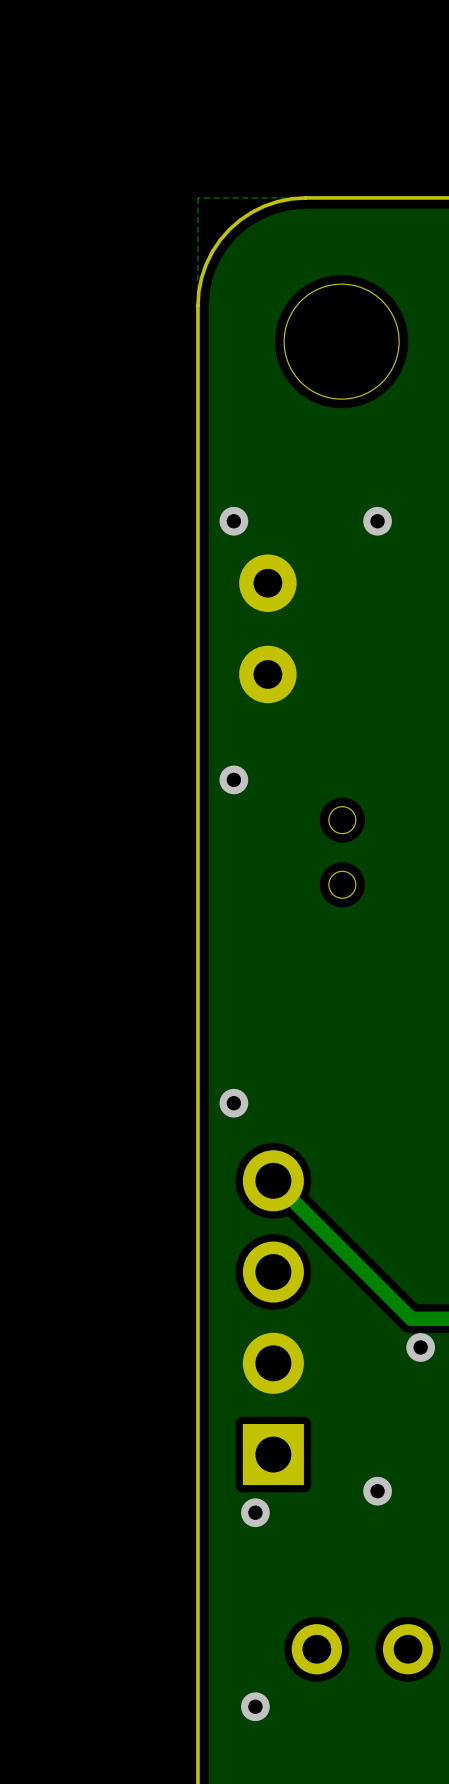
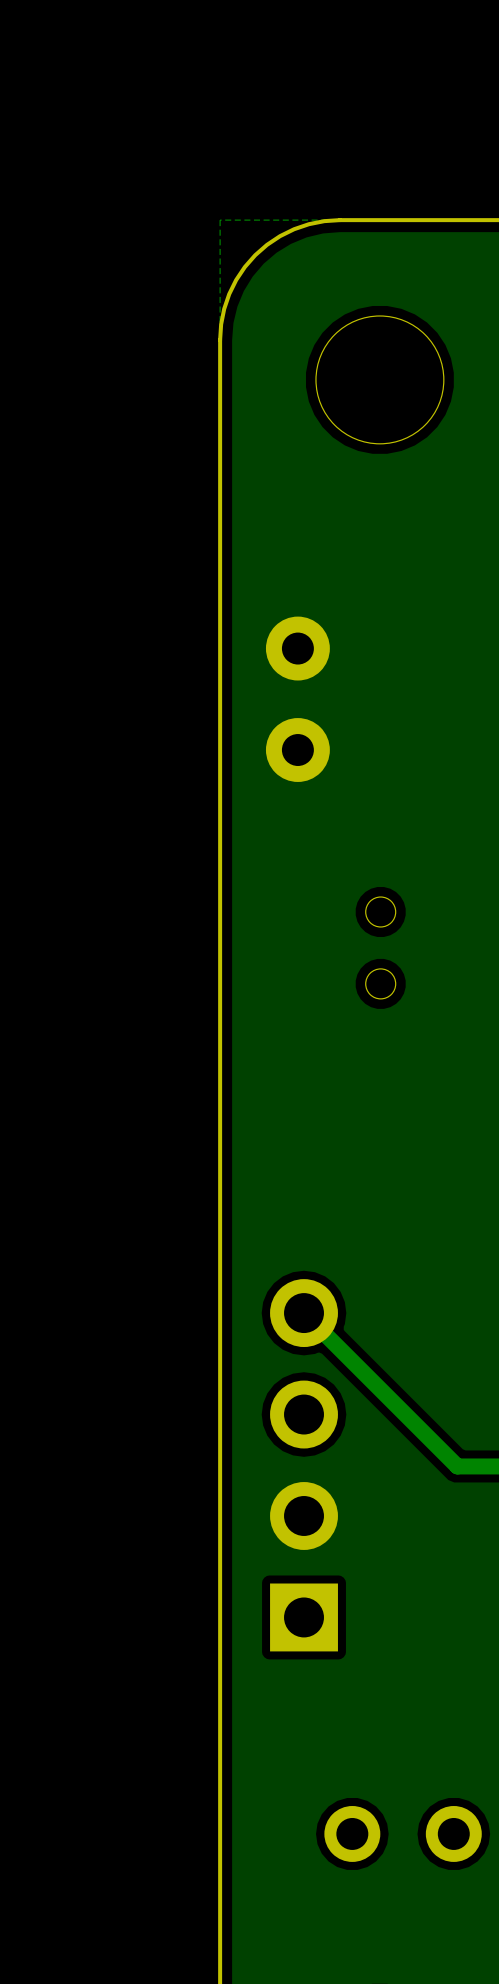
via: (233, 521) -> none
via: (377, 521) -> none
via: (233, 779) -> none
via: (233, 1103) -> none
via: (420, 1347) -> none
via: (377, 1491) -> none
via: (255, 1512) -> none
via: (255, 1706) -> none

